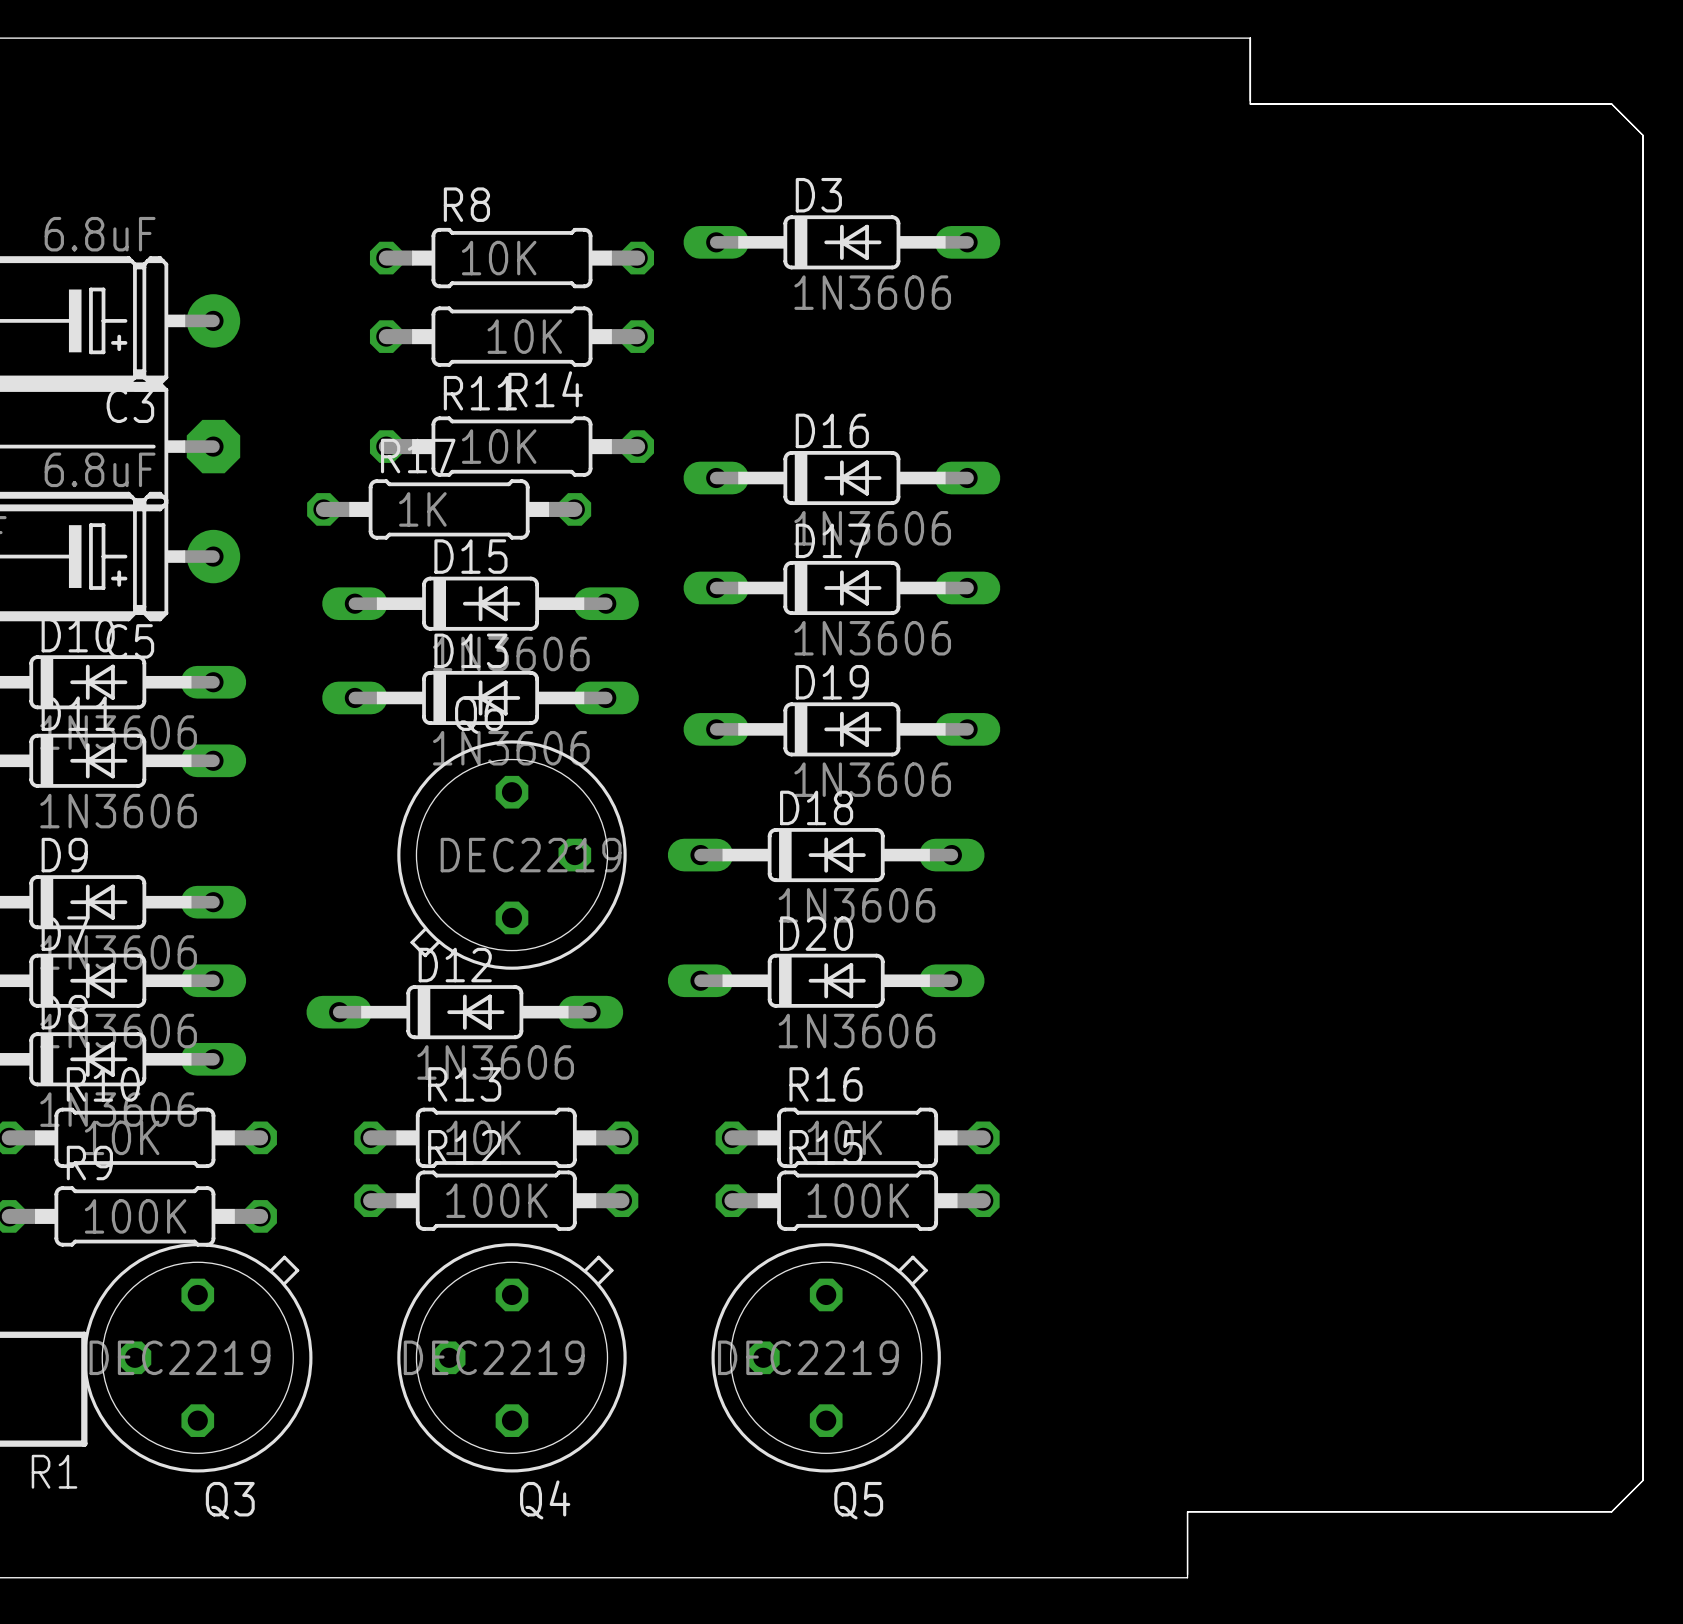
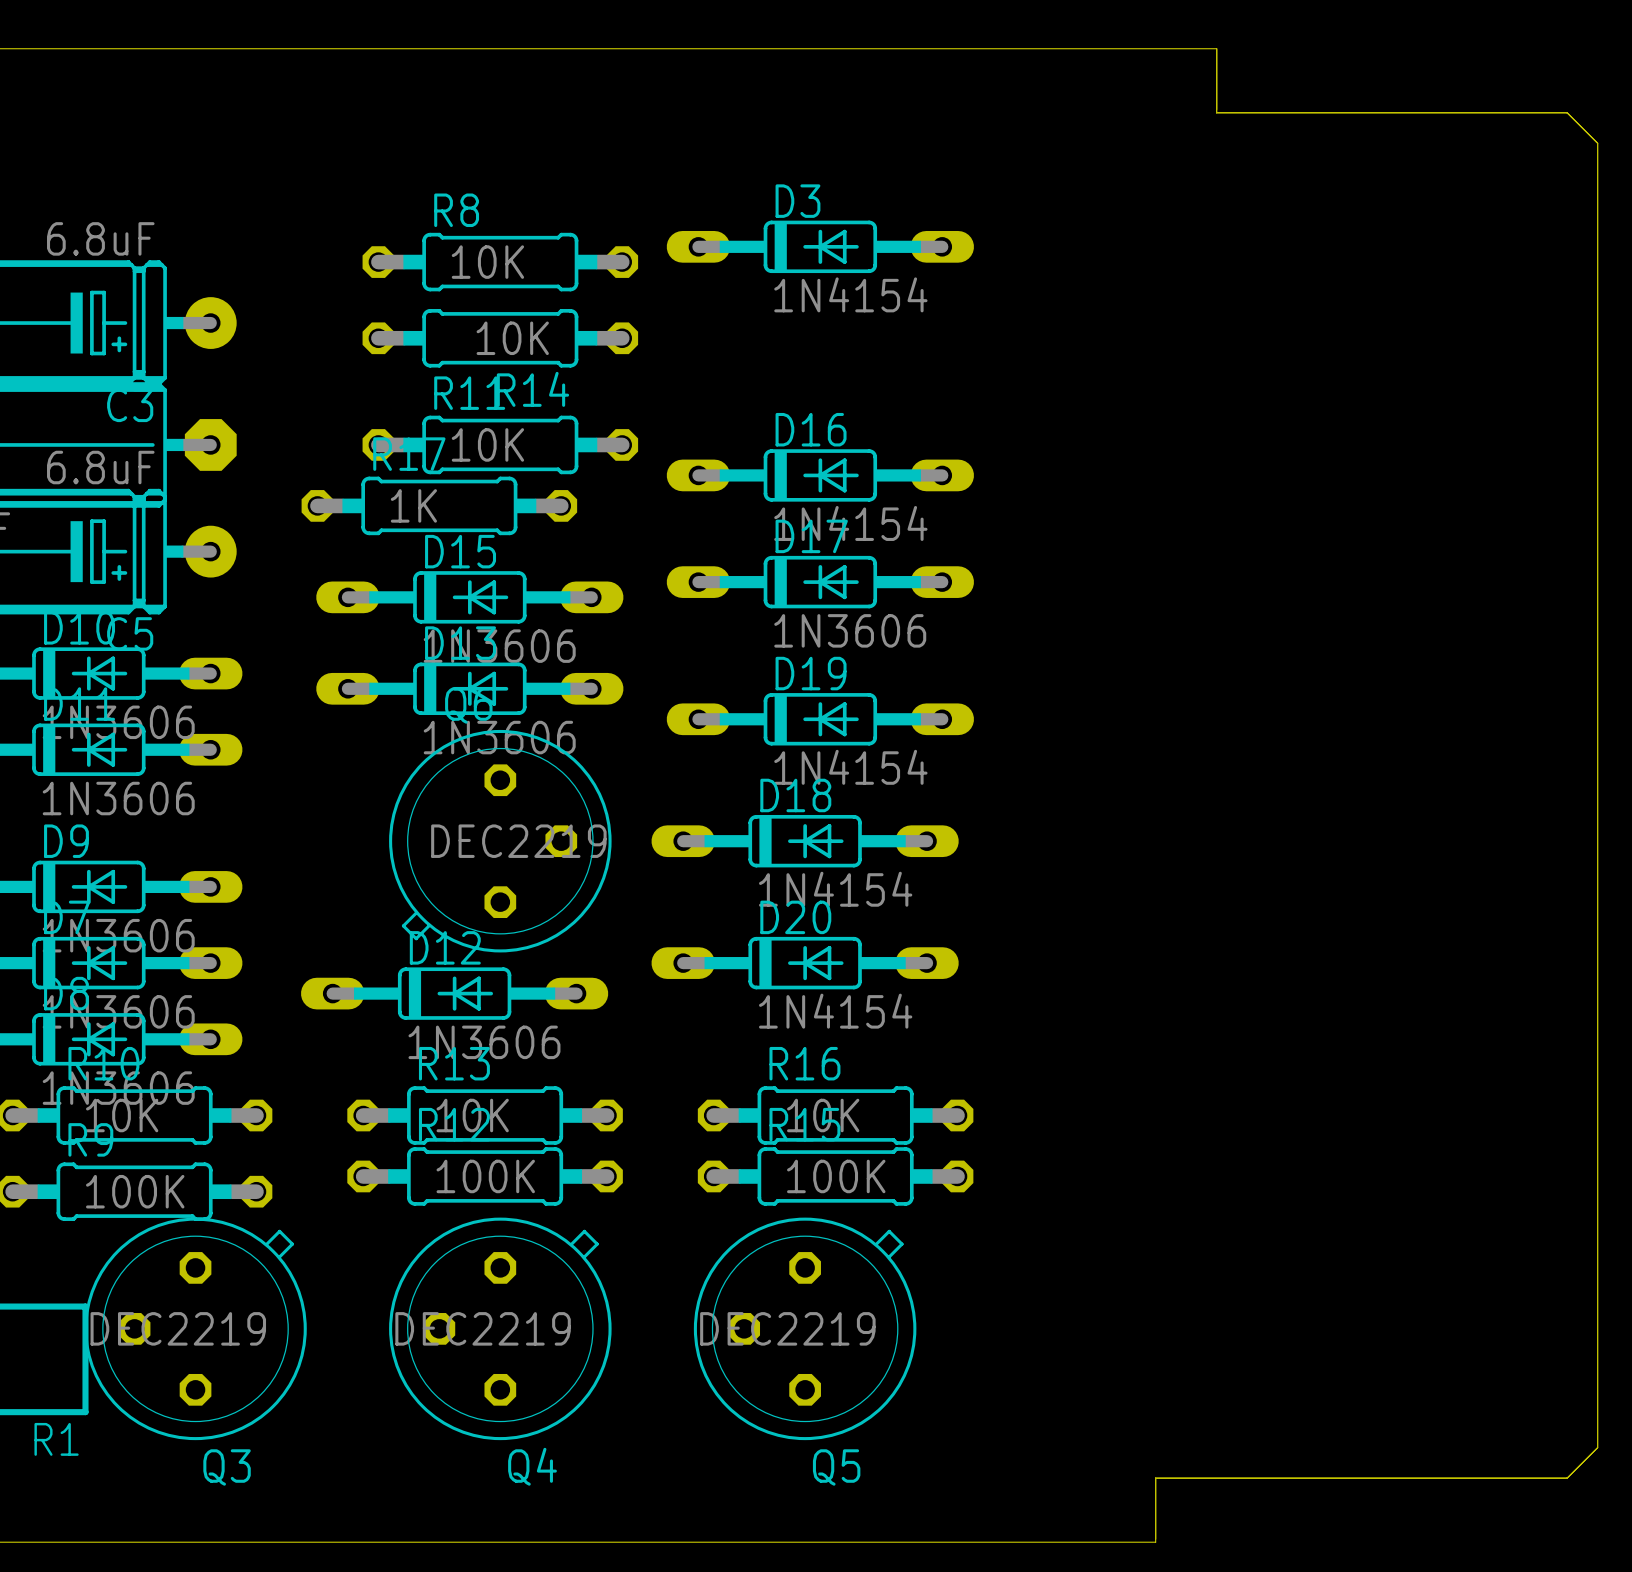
D3 value: 1N3606 (872, 292) -> 1N4154 (850, 294)
D16 value: 1N3606 (872, 528) -> 1N4154 (850, 523)
D19 value: 1N3606 (872, 779) -> 1N4154 (850, 767)
D18 value: 1N3606 (856, 905) -> 1N4154 (835, 889)
D20 value: 1N3606 (856, 1031) -> 1N4154 (835, 1011)

